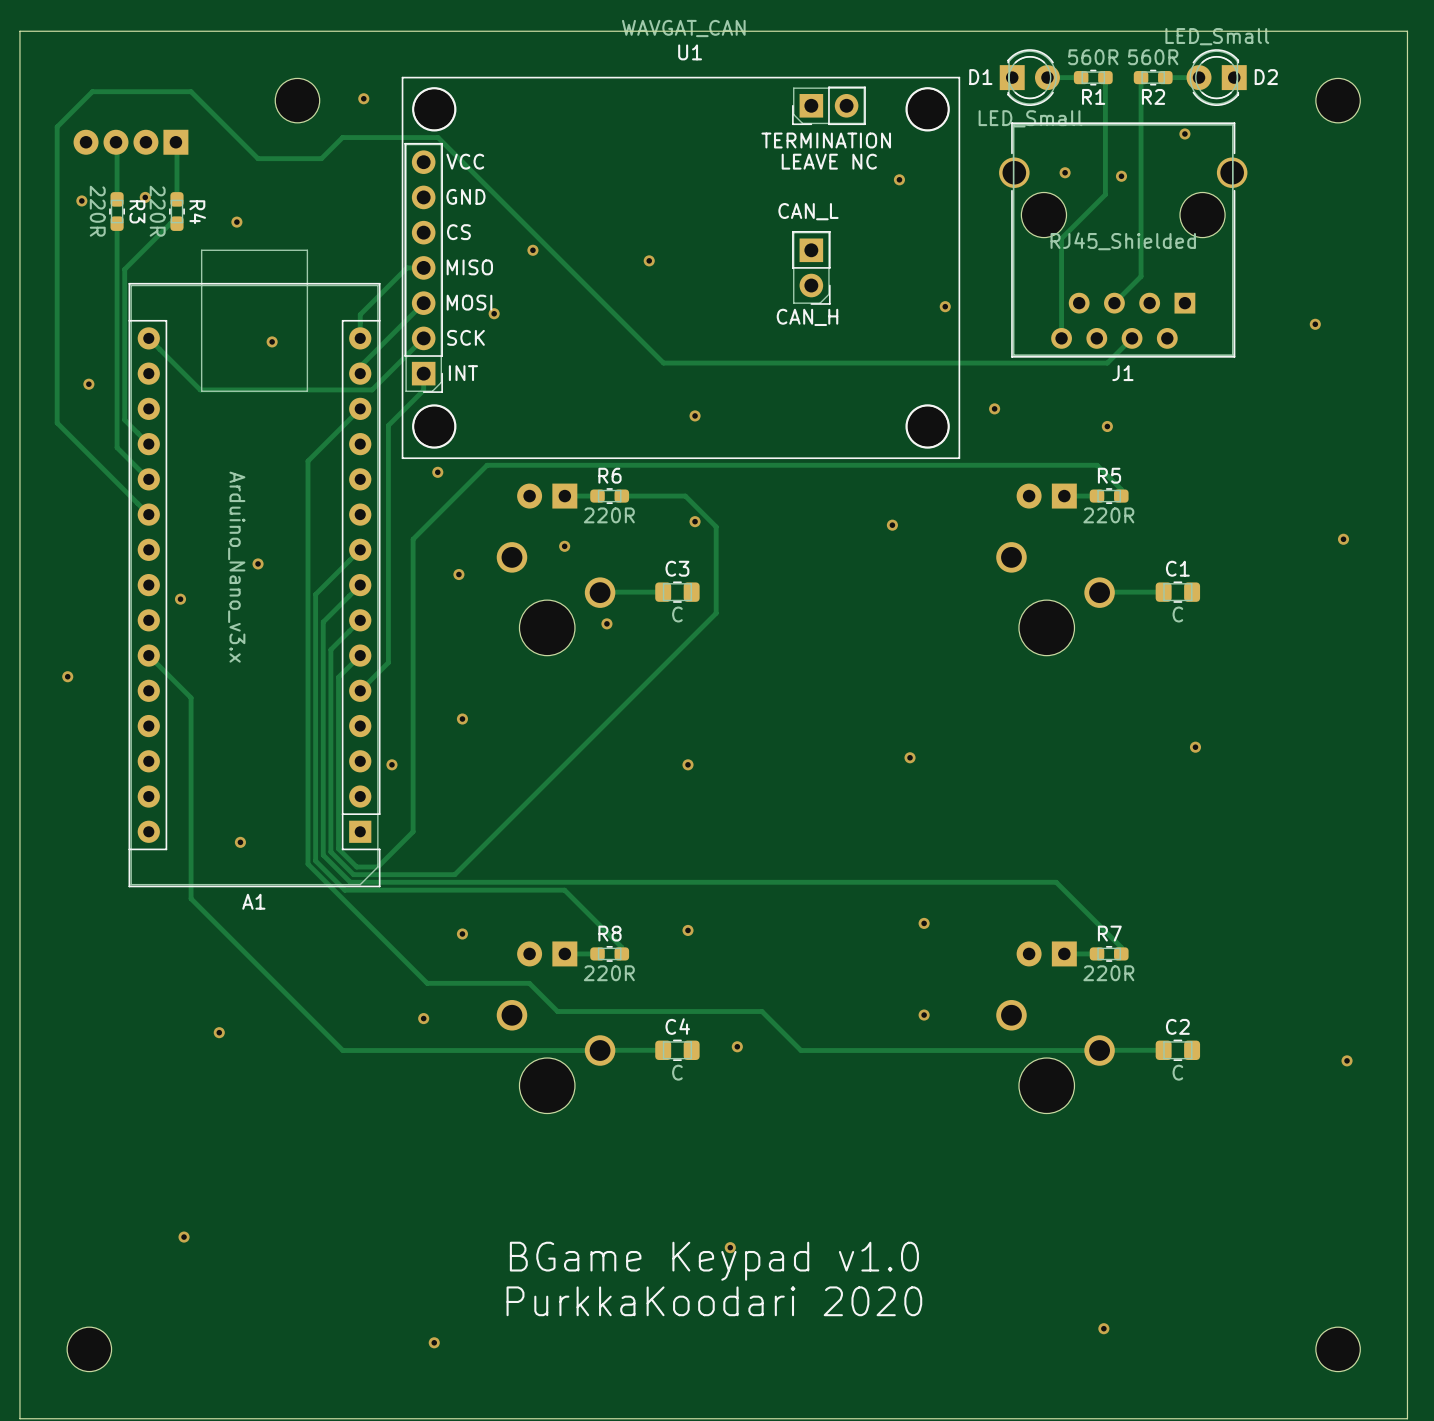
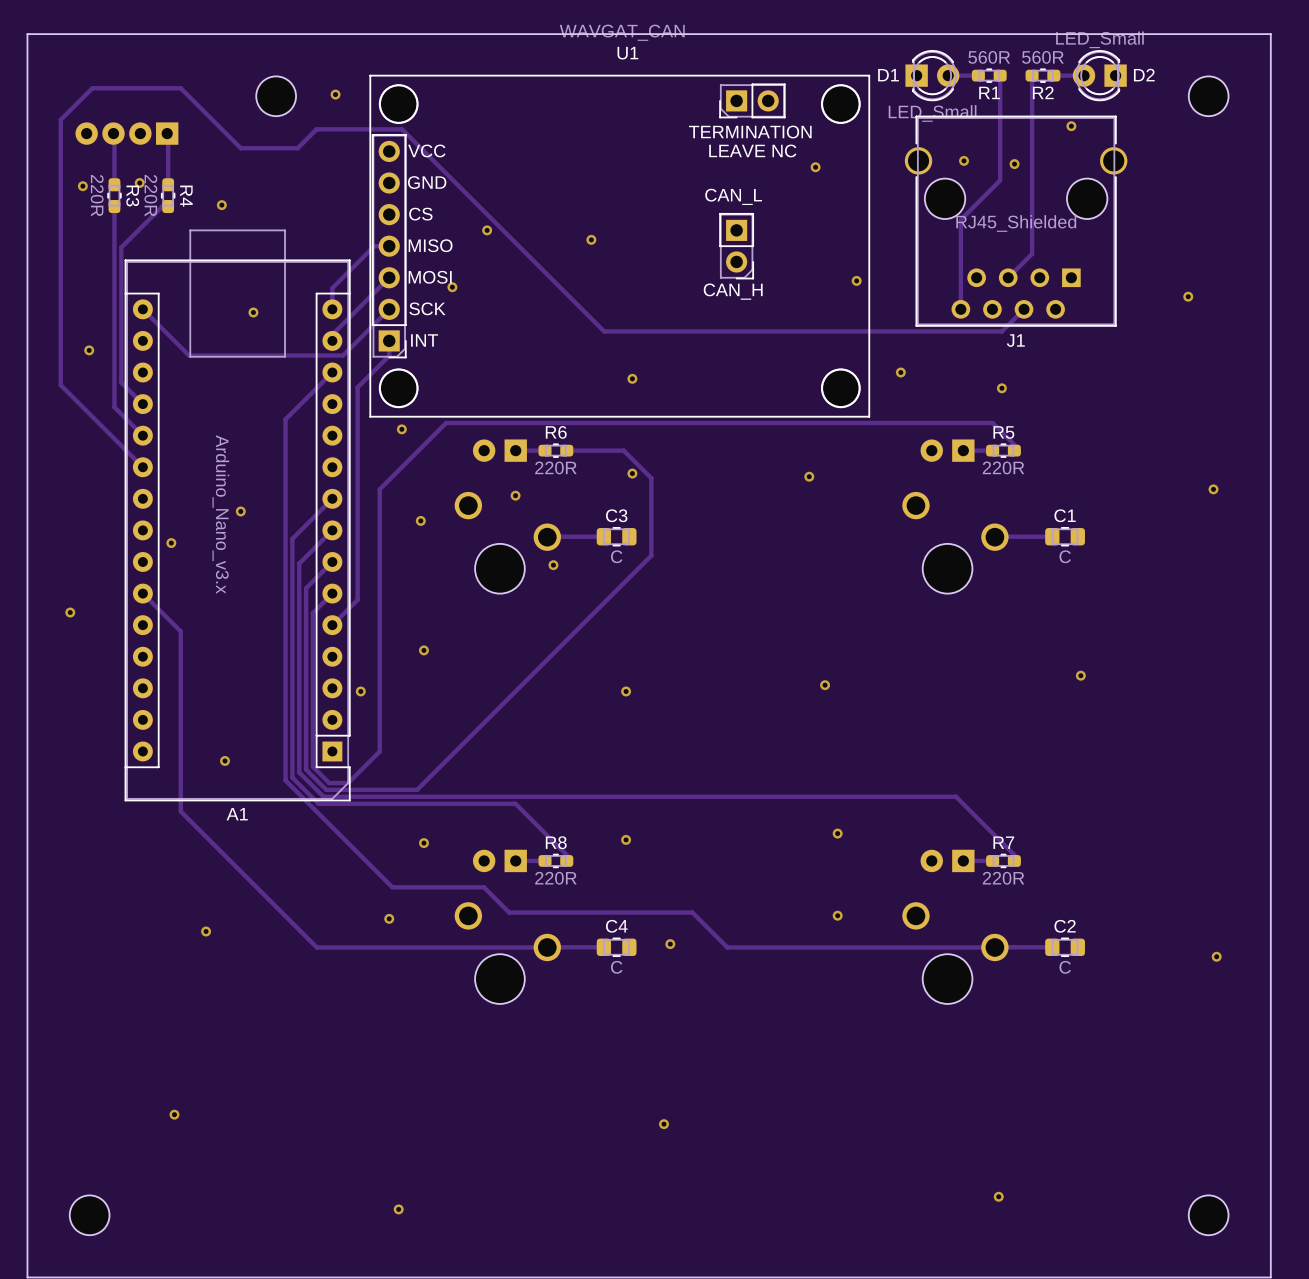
text: BGame Keypad v1.0 (714, 1261) -> none
text: PurkkaKoodari 2020 (714, 1301) -> none

